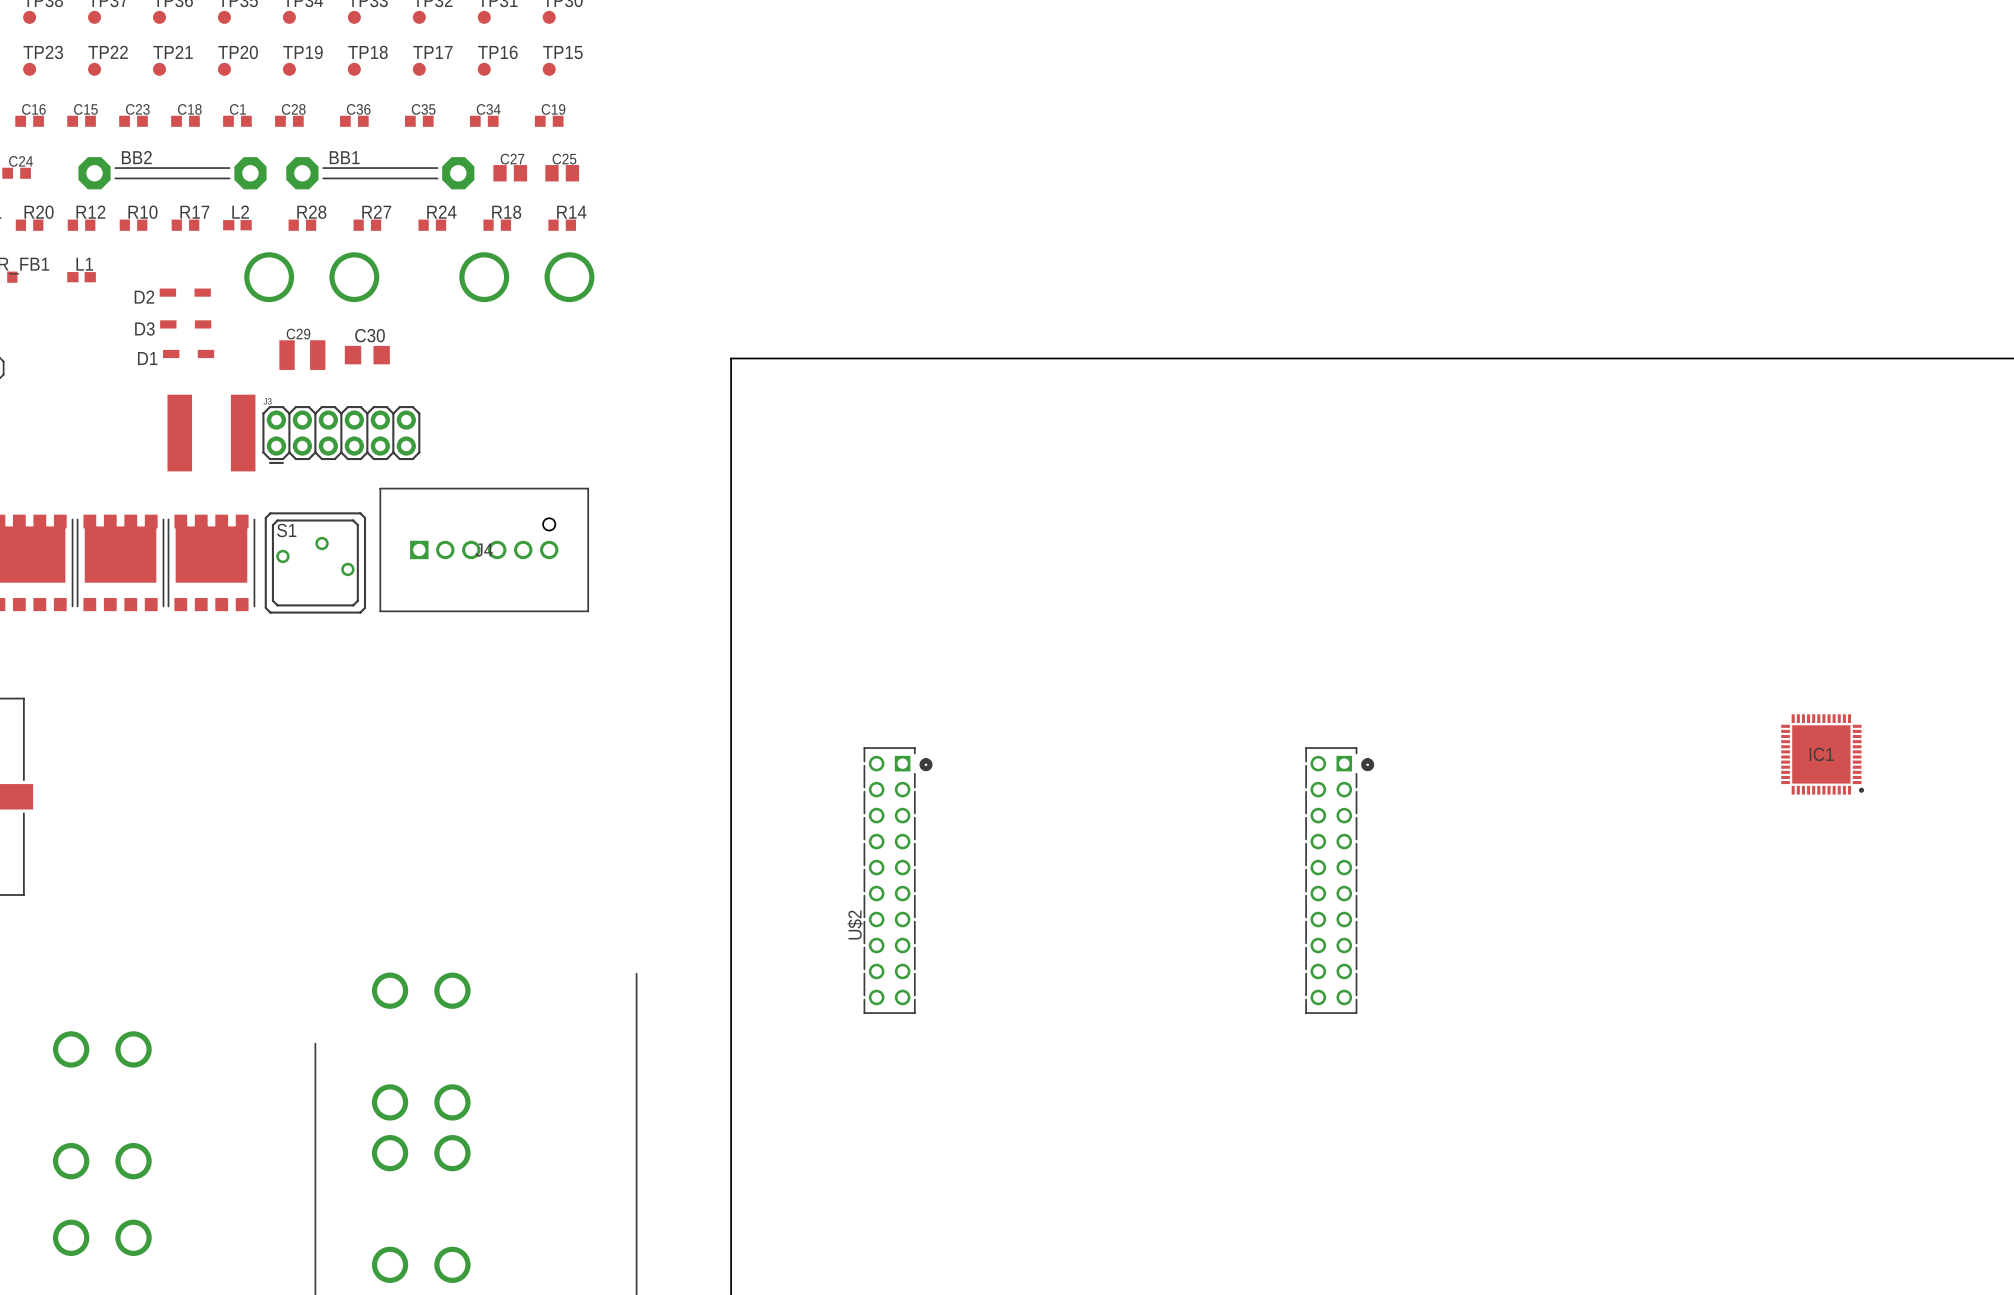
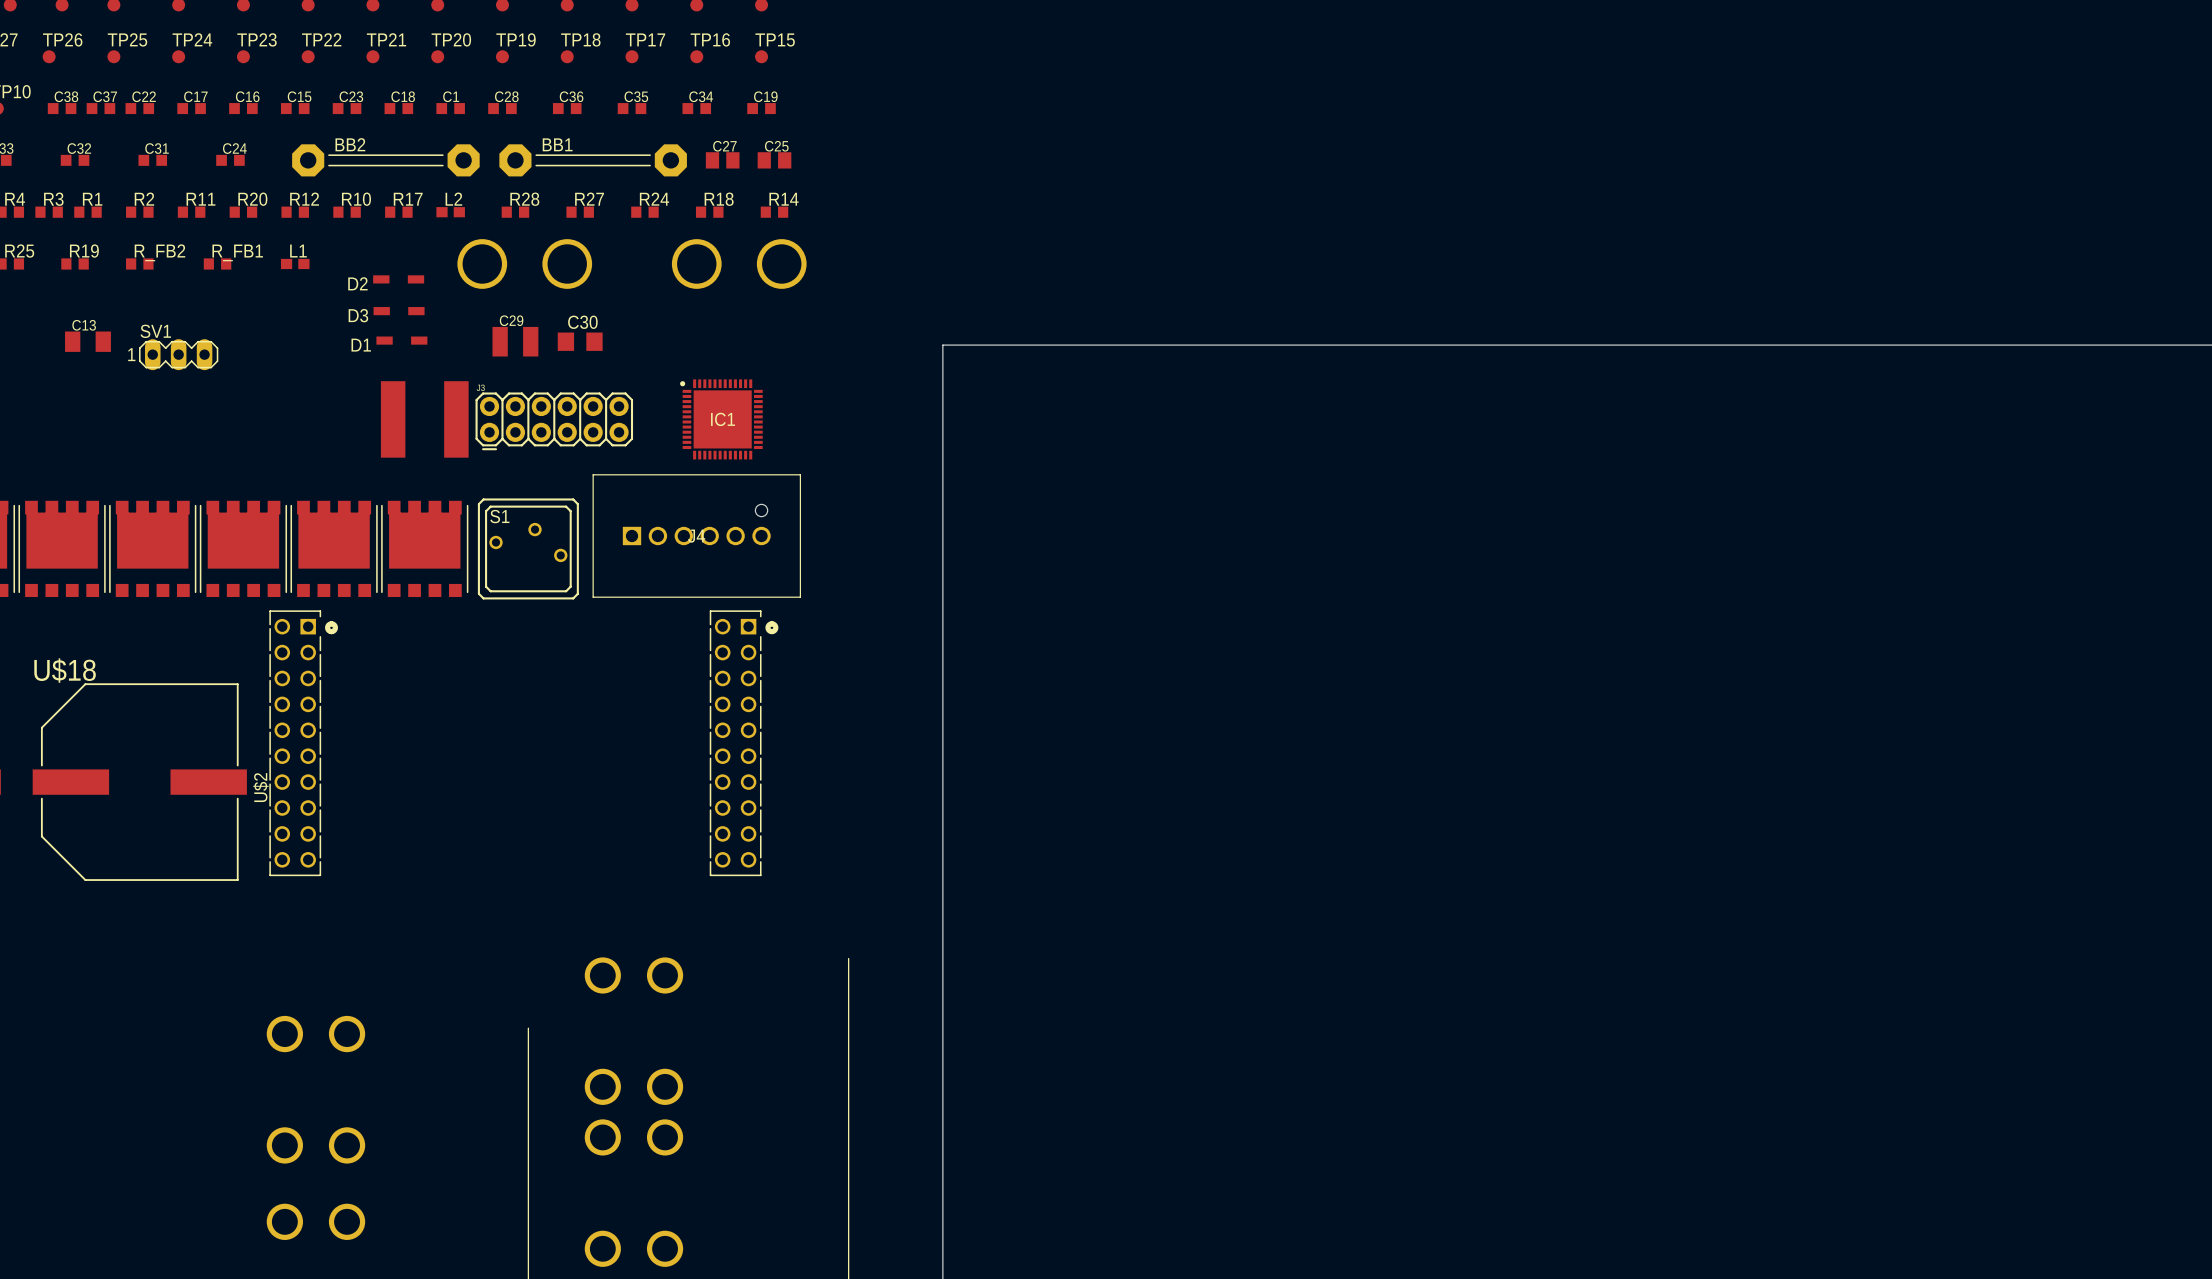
IC1 rotation: 0° (1822, 754) -> 180° (721, 419)
IC1 position: (1822, 754) -> (721, 419)
U$2 position: (1118, 880) -> (523, 743)

